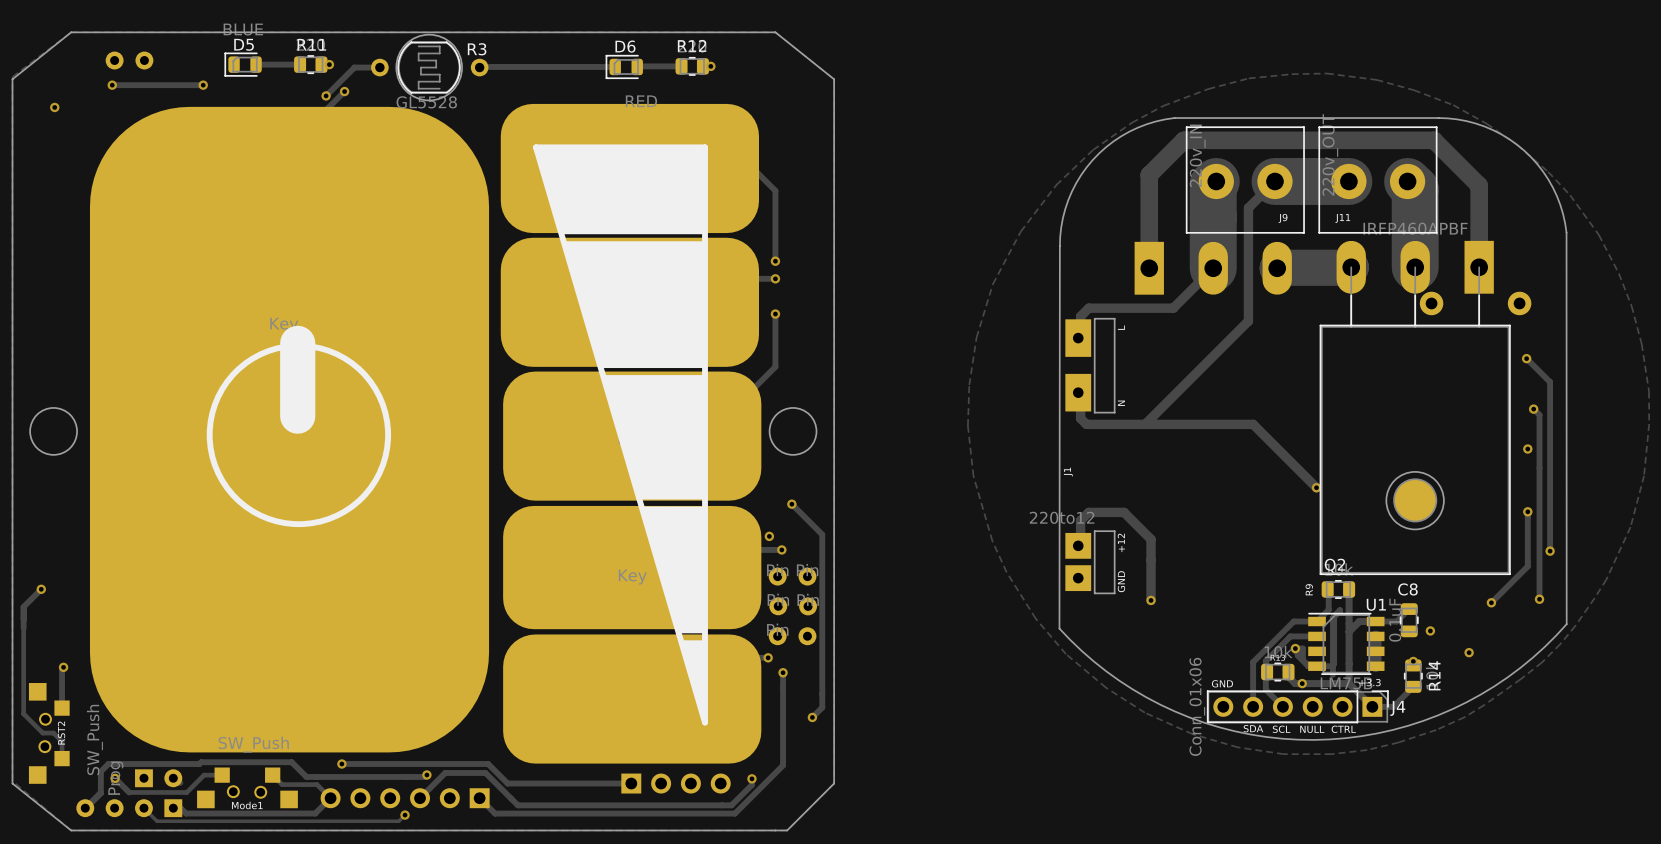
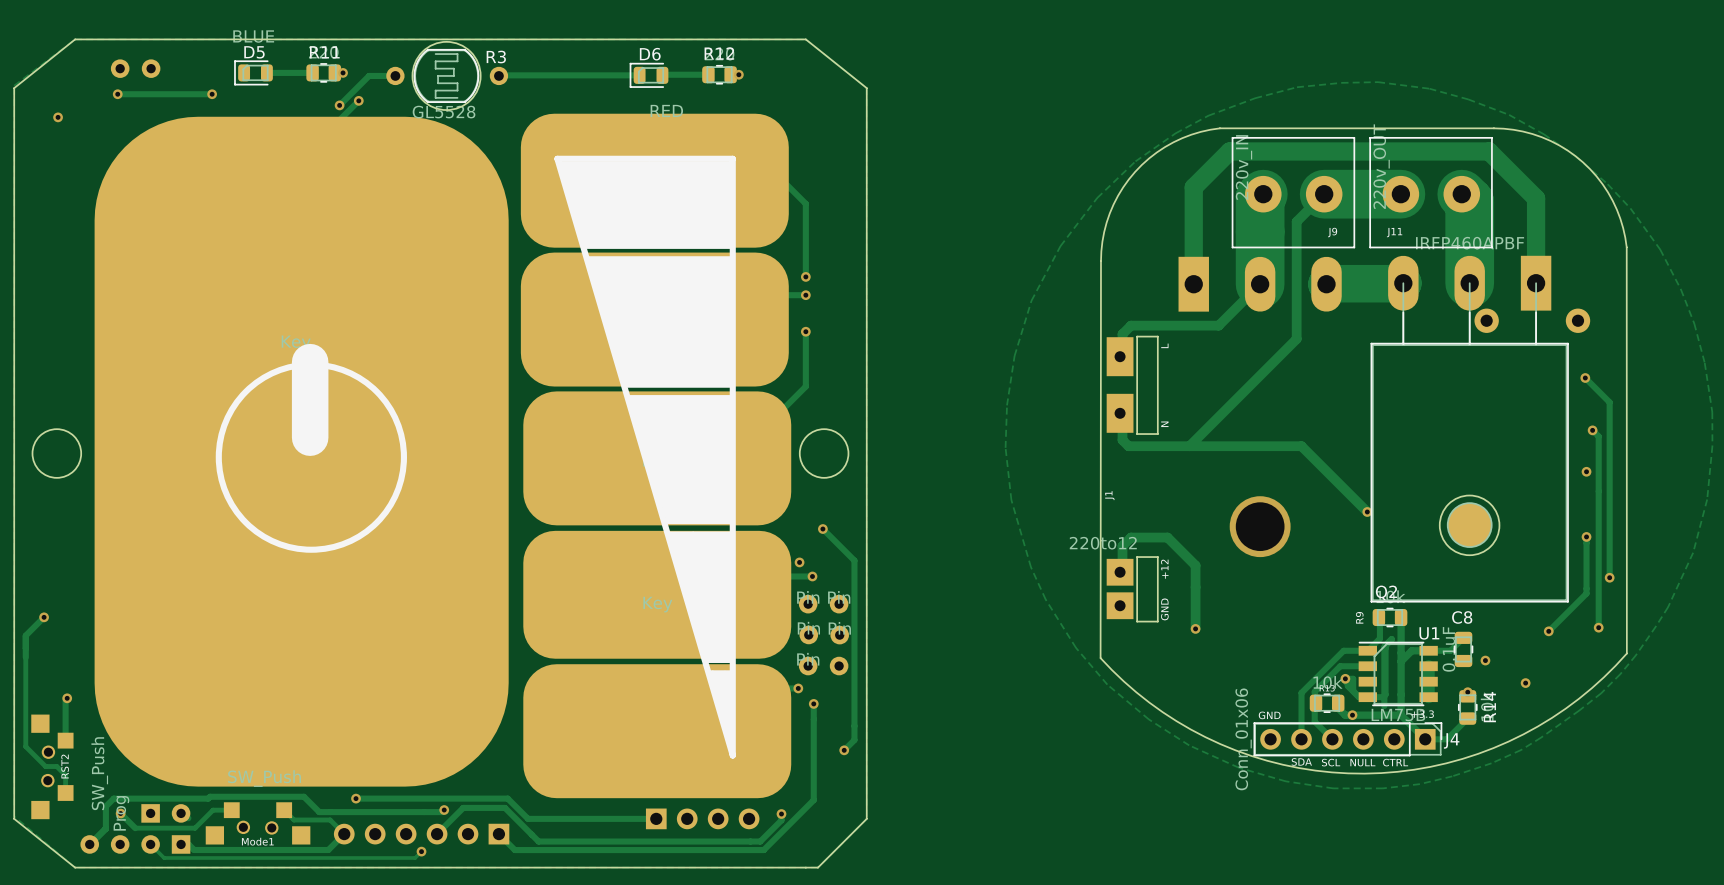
via: none -> (1260, 526)

